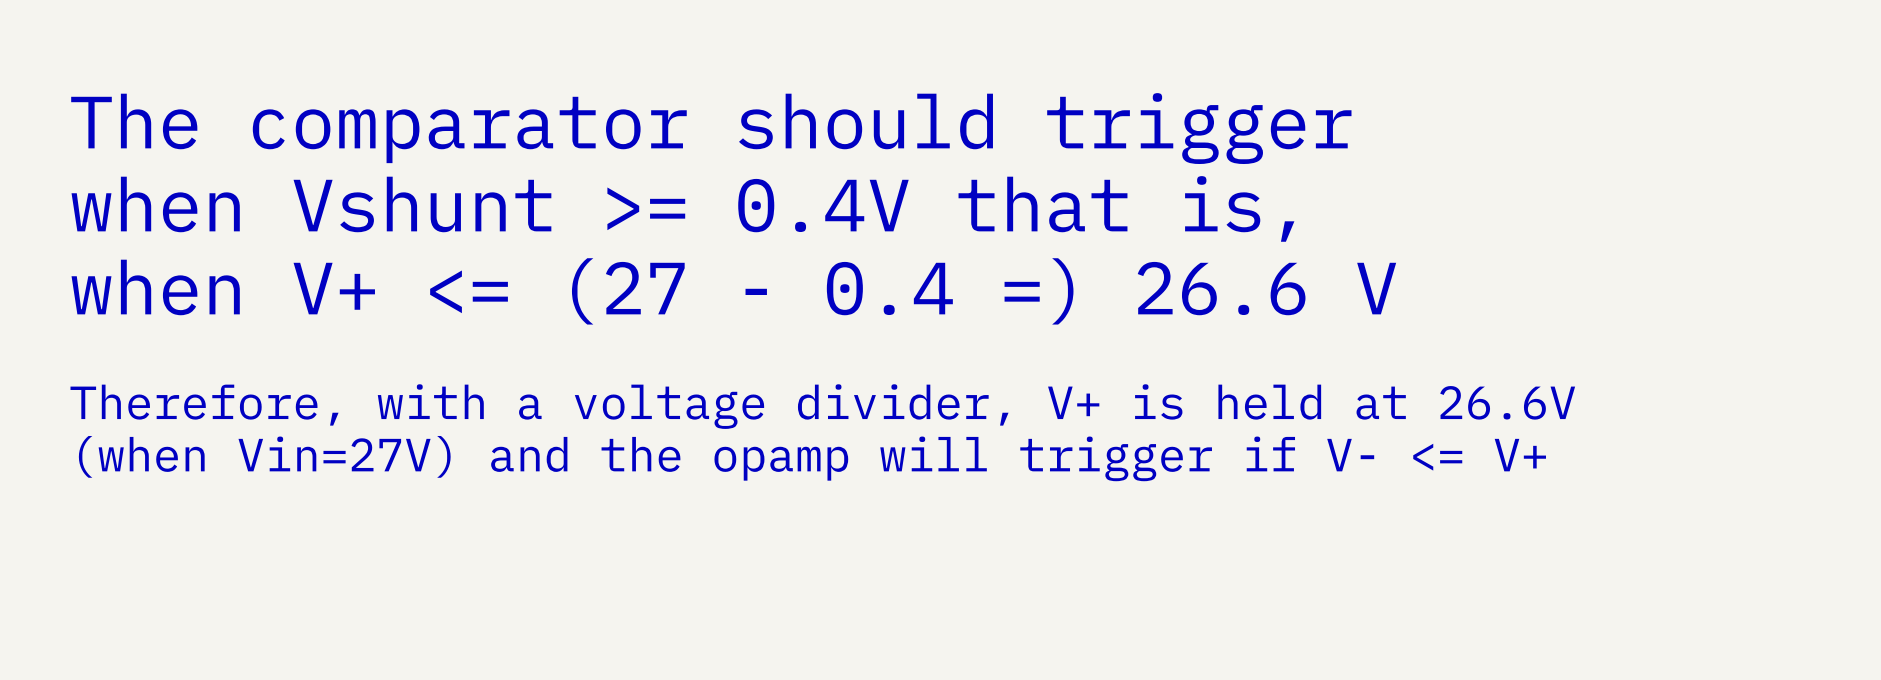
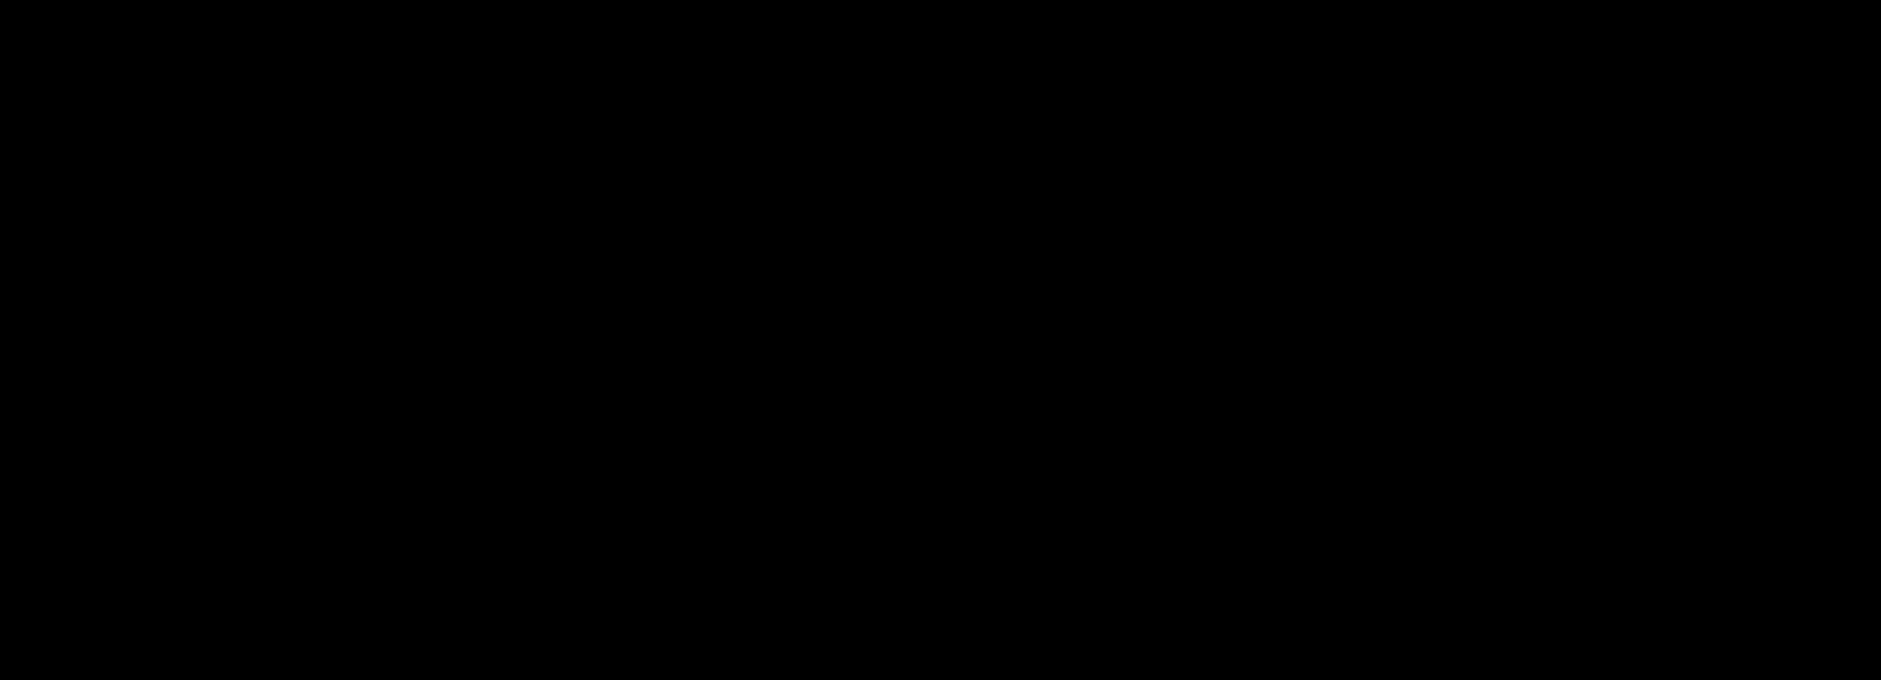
text: The comparator should trigger (711, 128) -> none
text: when Vshunt >= 0.4V that is, (682, 208) -> none
text: when V+ <= (27 - 0.4 =) 26.6 V (733, 291) -> none
text: Therefore, with a voltage divider, V+ is held at 26.6V (822, 406) -> none
text: (when Vin=27V) and the opamp will trigger if V- <= V+ (812, 458) -> none

